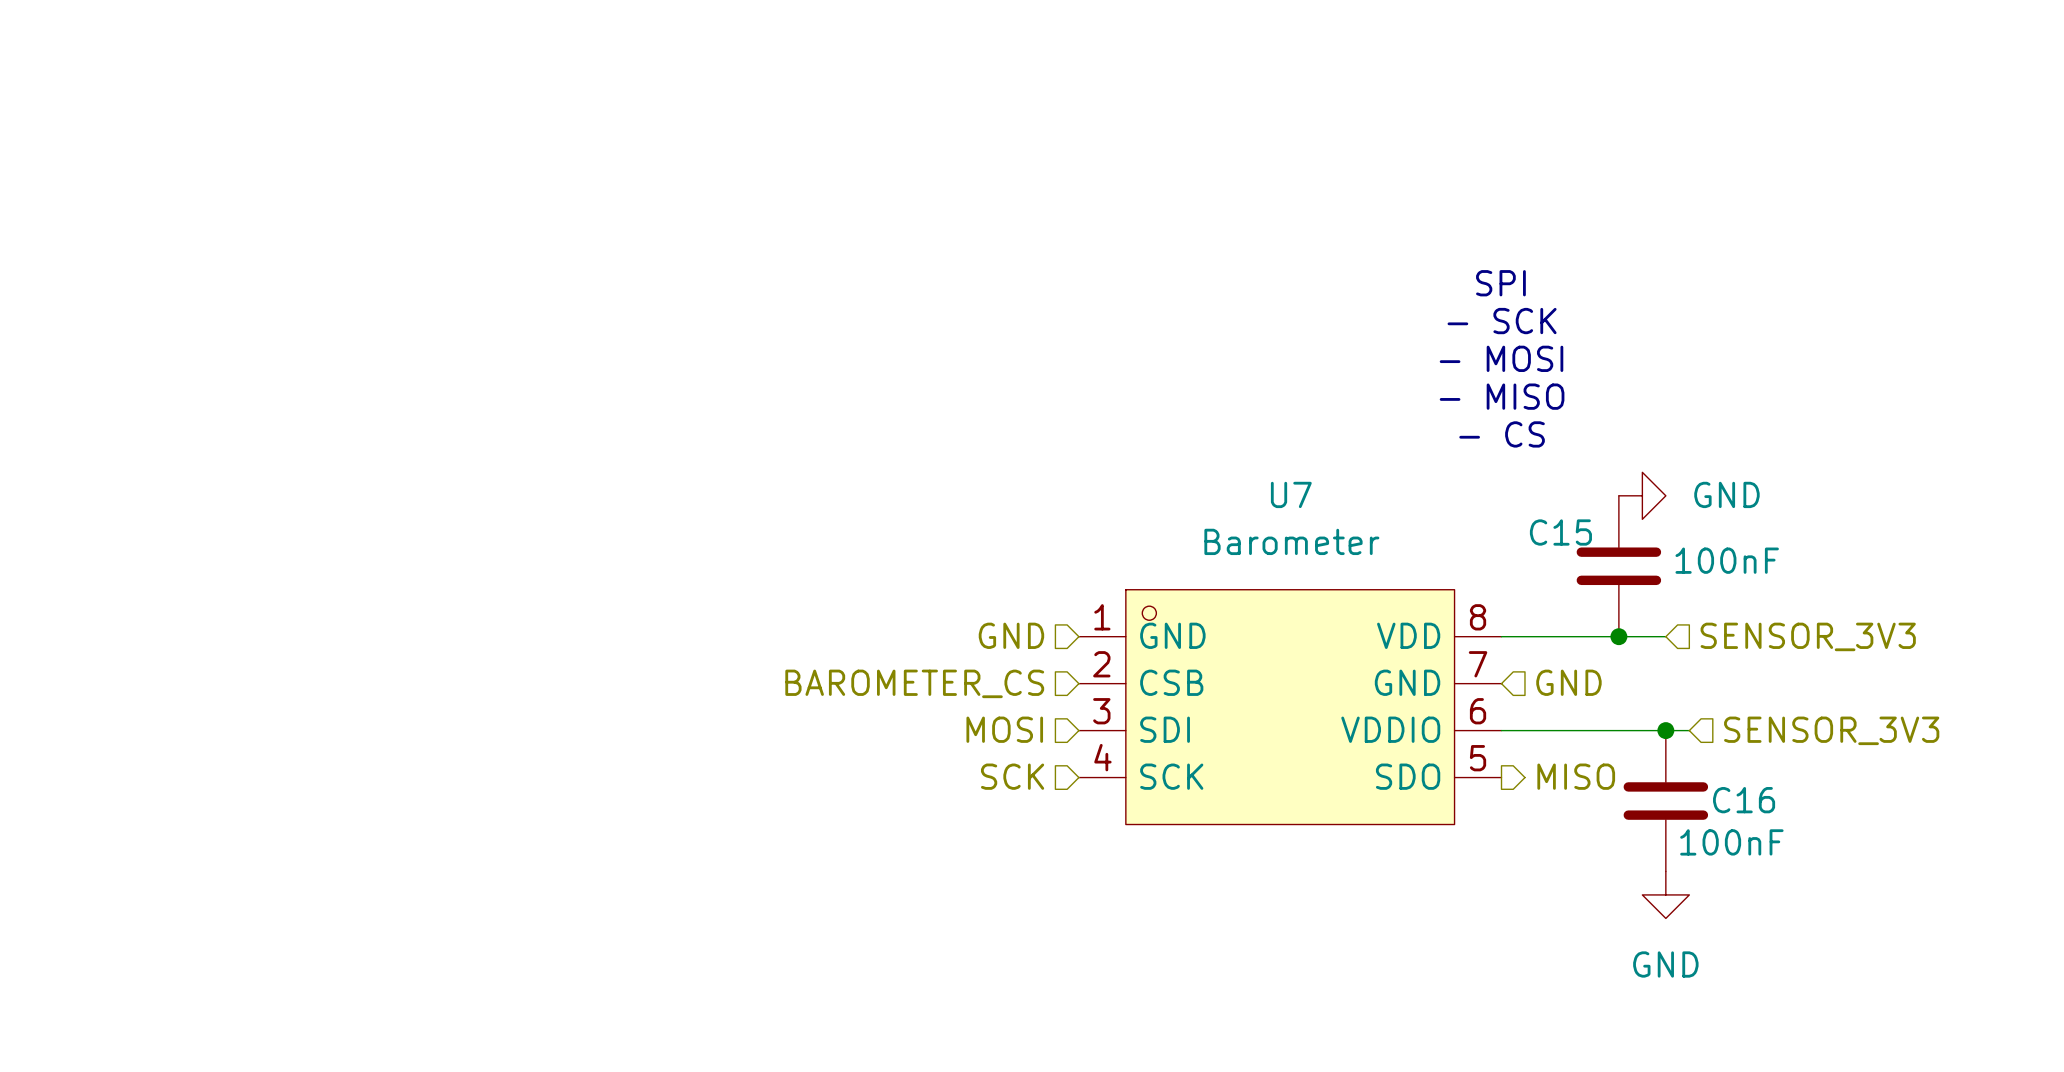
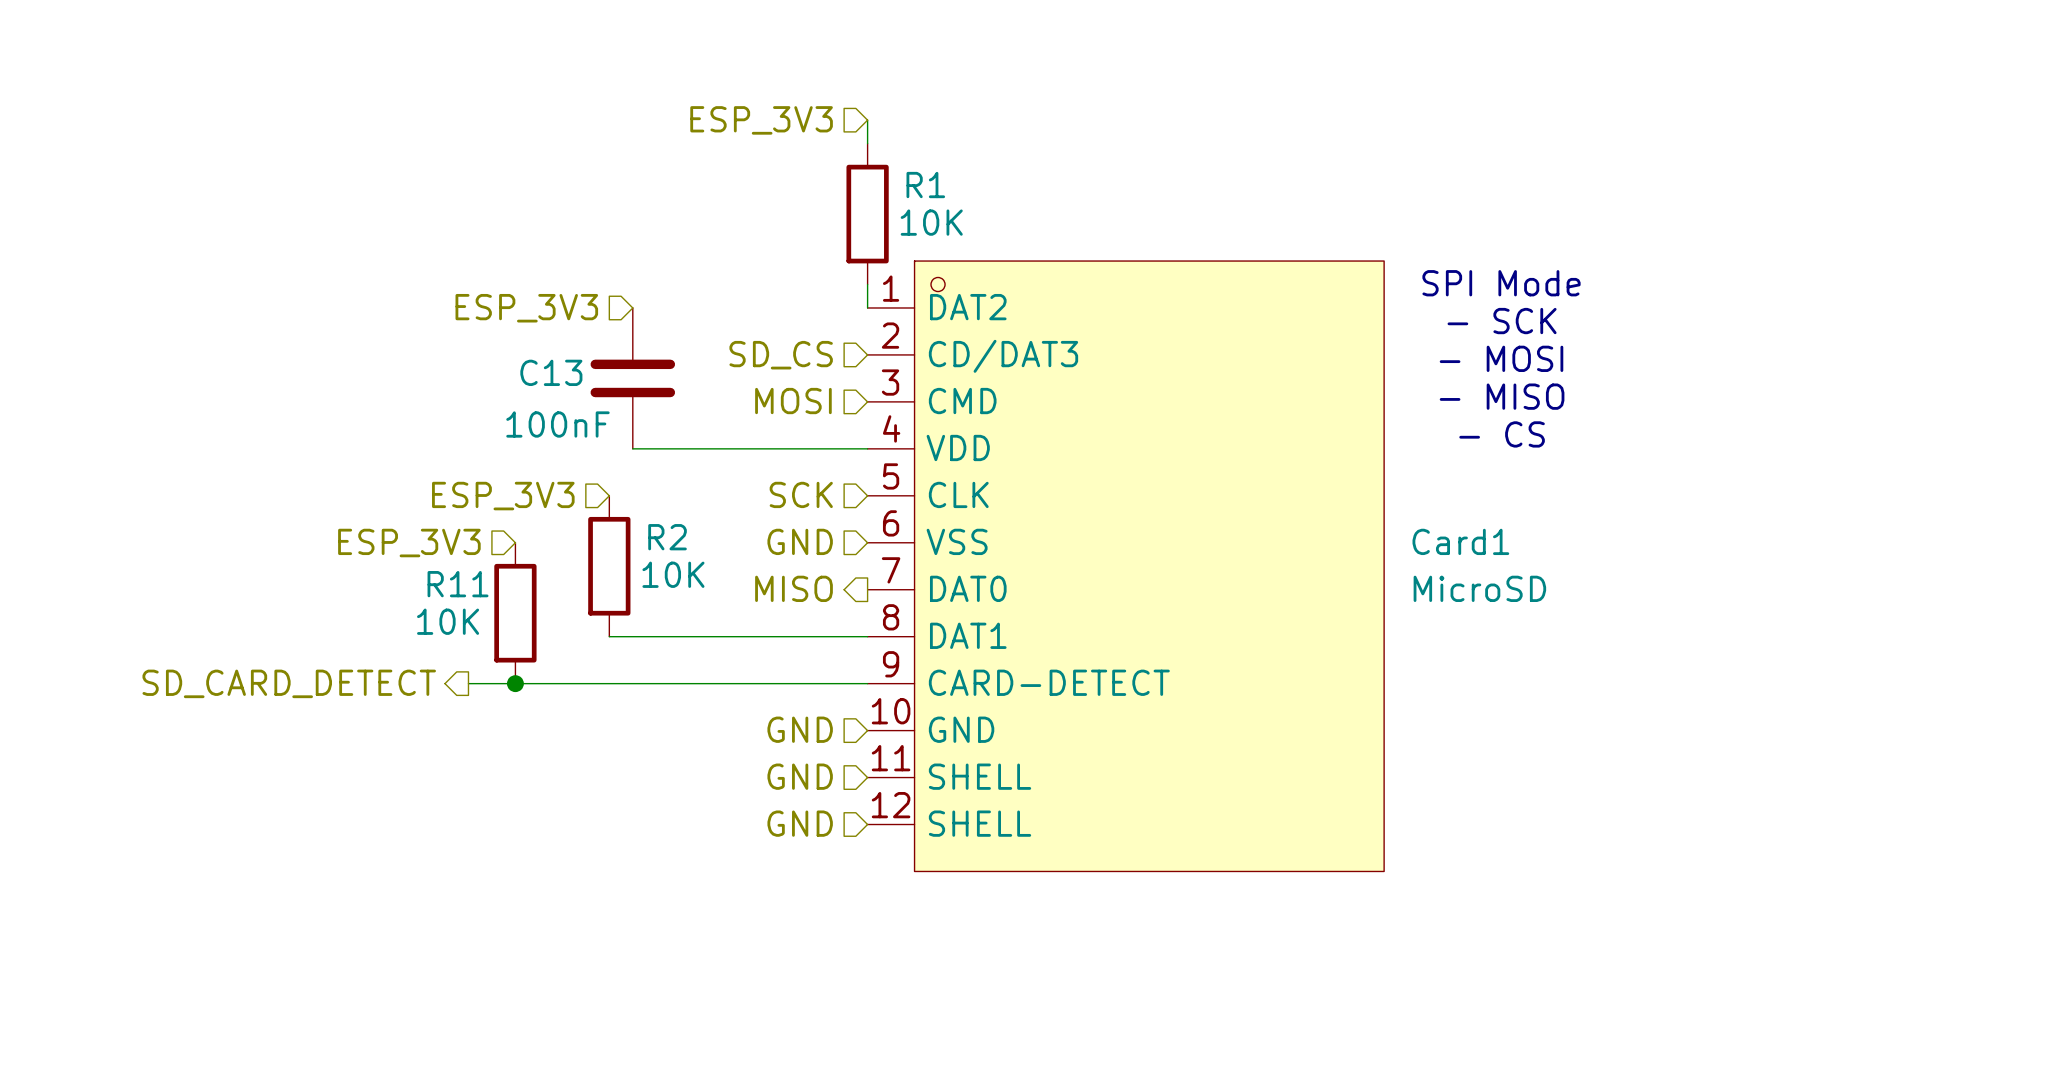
hierarchical label: none -> ESP_3V3 (761, 120)
wire: none -> (867, 120) (867, 143)
R1: none -> 10K (867, 214)
text: SPI (1500, 283) -> SPI Mode (1501, 283)
wire: none -> (867, 284) (867, 307)
hierarchical label: none -> ESP_3V3 (526, 308)
hierarchical label: none -> SD_CS (781, 355)
C13: none -> 100nF (632, 378)
wire: none -> (632, 448) (867, 448)
power symbol: GND (1642, 495) -> none
hierarchical label: none -> ESP_3V3 (503, 496)
hierarchical label: none -> GND (800, 541)
hierarchical label: none -> ESP_3V3 (409, 543)
R2: none -> 10K (609, 566)
Card1: none -> MicroSD (1125, 566)
C15: 100nF (1618, 566) -> none
hierarchical label: none -> MISO (794, 588)
R11: none -> 10K (515, 613)
hierarchical label: GND (1011, 635) -> none
wire: none -> (609, 636) (867, 636)
wire: (1501, 636) (1665, 636) -> none
junction: (1618, 636) -> none
hierarchical label: SENSOR_3V3 (1808, 636) -> none
hierarchical label: GND (1568, 682) -> none
hierarchical label: none -> SD_CARD_DETECT (289, 683)
wire: none -> (468, 683) (867, 683)
junction: none -> (515, 683)
hierarchical label: BAROMETER_CS (914, 683) -> none
U7: Barometer (1290, 707) -> none
hierarchical label: none -> GND (800, 729)
hierarchical label position: MOSI (1004, 729) -> MOSI (793, 401)
wire: (1501, 730) (1689, 730) -> none
junction: (1665, 730) -> none
hierarchical label: SENSOR_3V3 (1831, 730) -> none
hierarchical label: none -> GND (800, 776)
hierarchical label position: SCK (1012, 776) -> SCK (801, 494)
hierarchical label: MISO (1576, 776) -> none
C16: 100nF (1665, 801) -> none
hierarchical label: none -> GND (800, 823)
power symbol: GND (1665, 894) -> none

